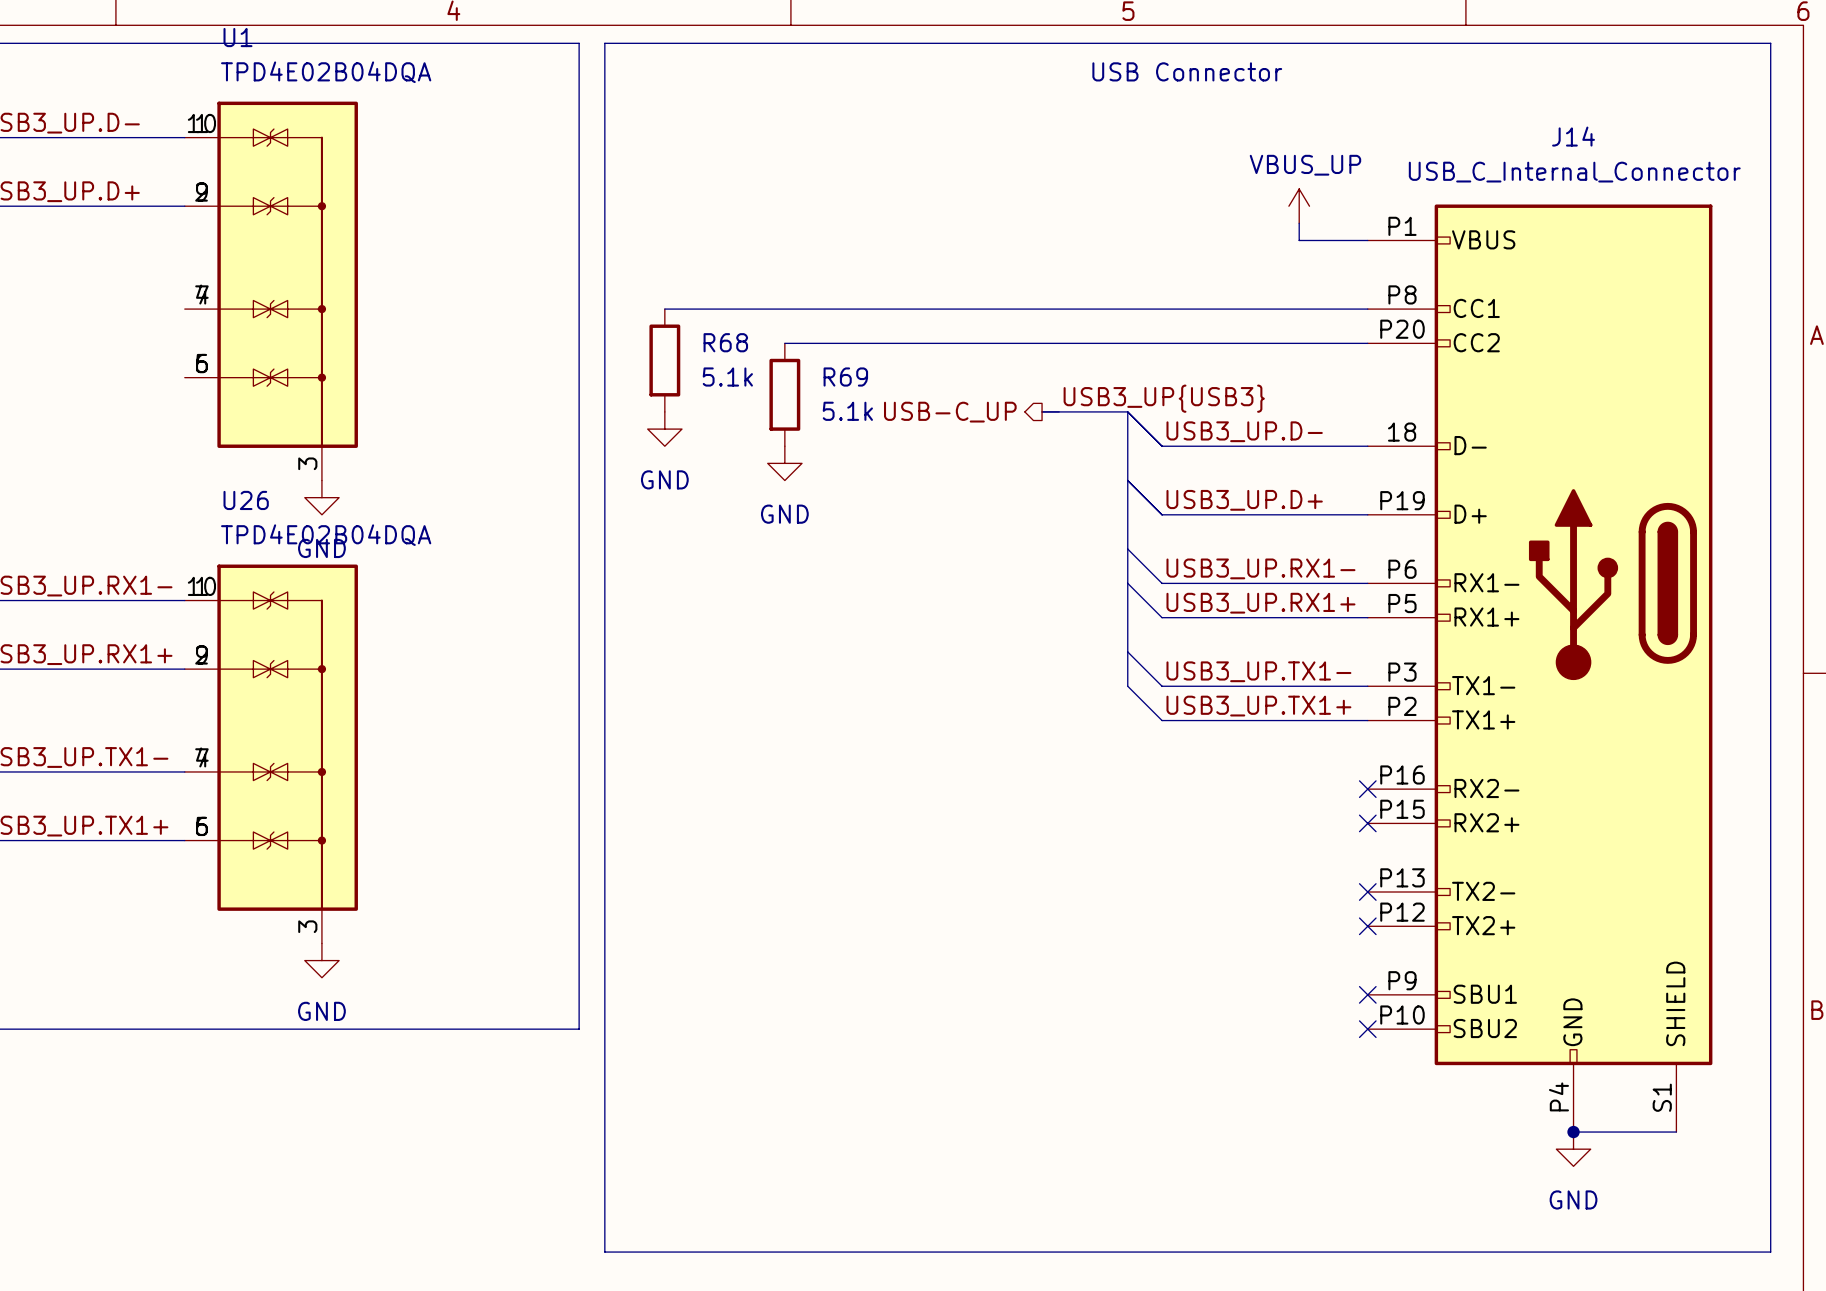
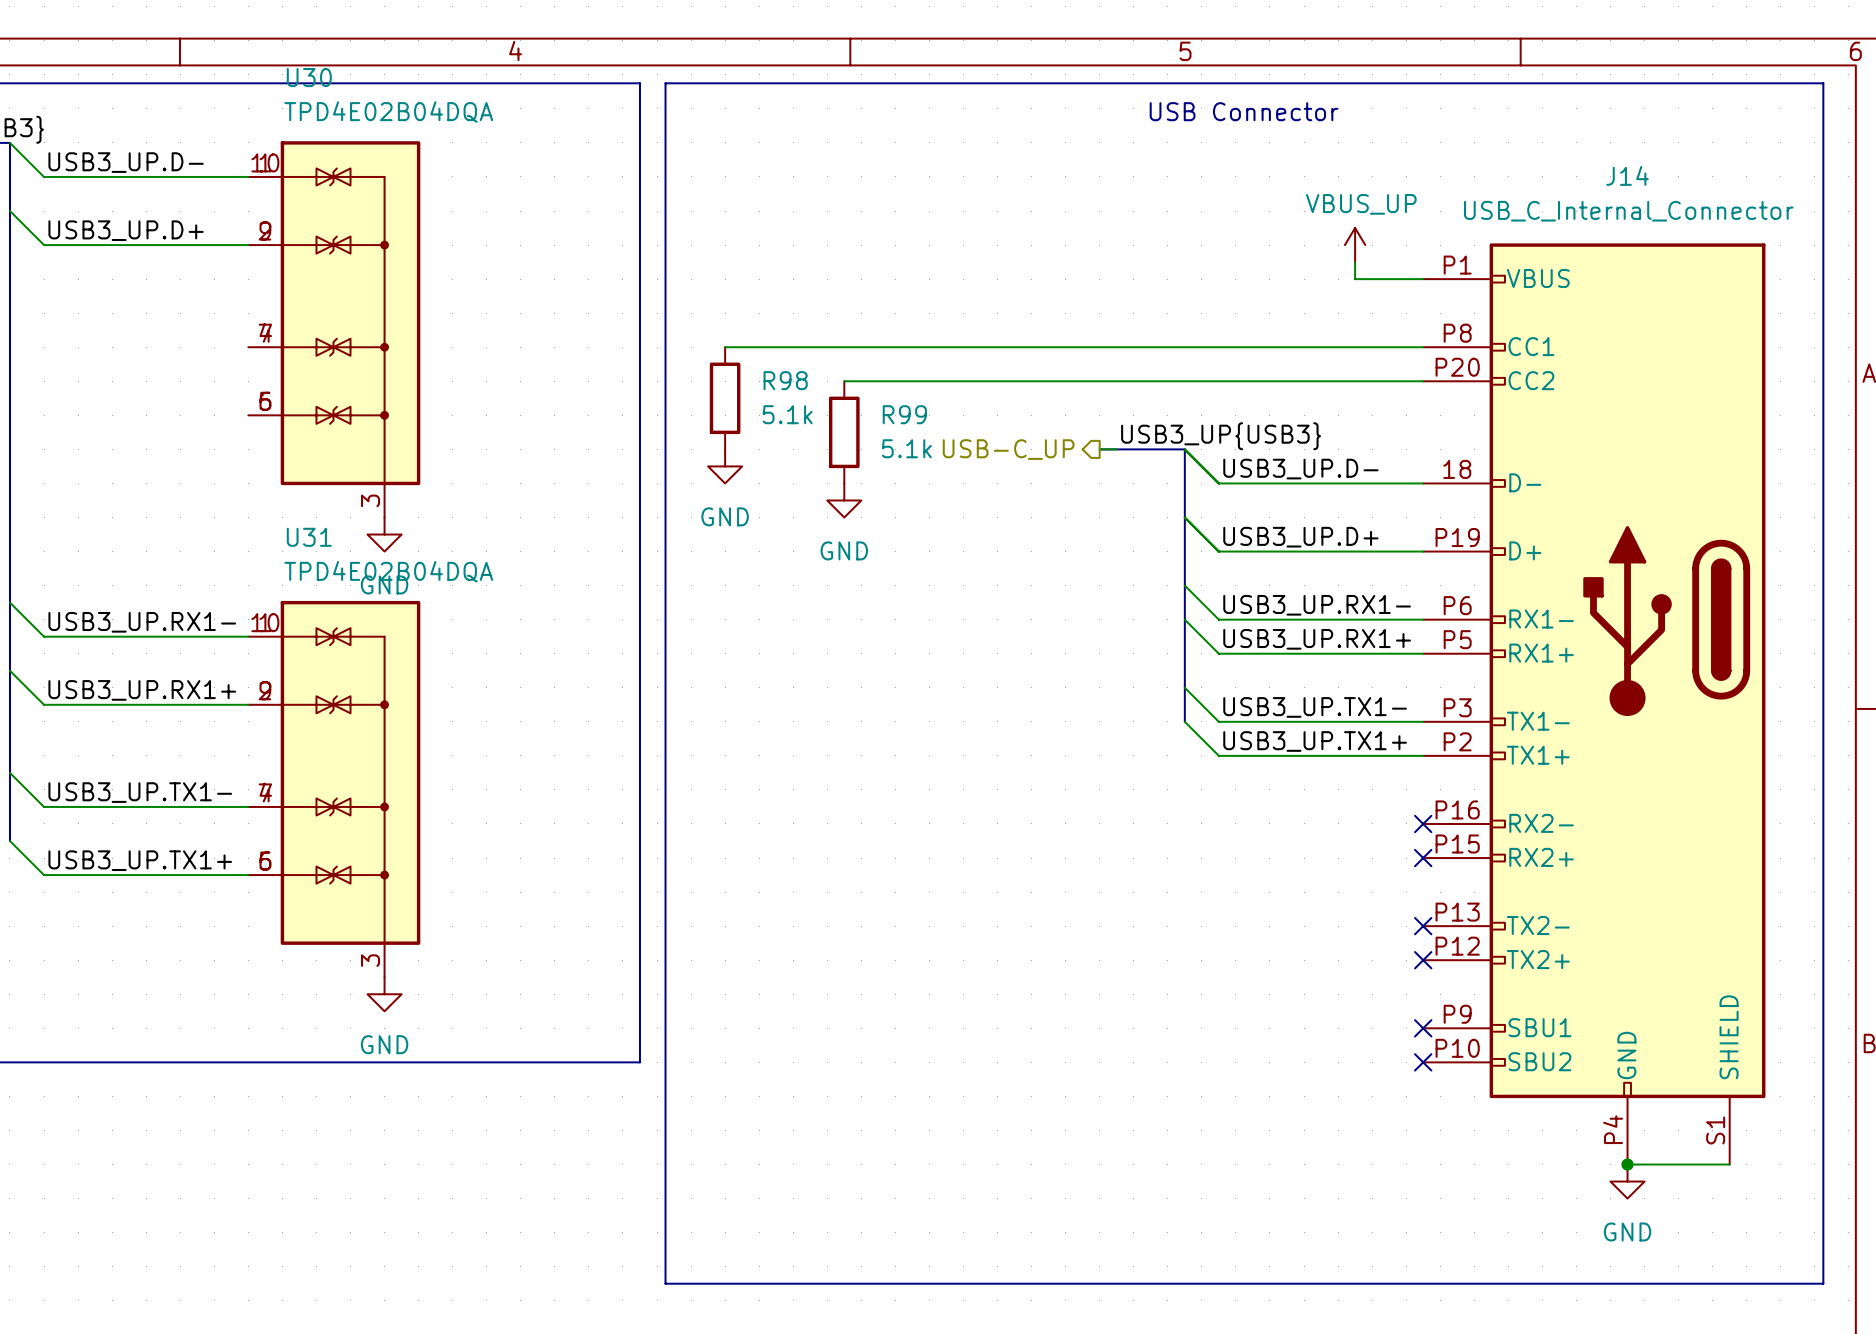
U1 name: U1 (237, 37) -> U30 (309, 77)
R68 name: R68 (725, 342) -> R98 (785, 380)
R69 name: R69 (845, 377) -> R99 (904, 414)
U26 name: U26 (246, 500) -> U31 (309, 537)

